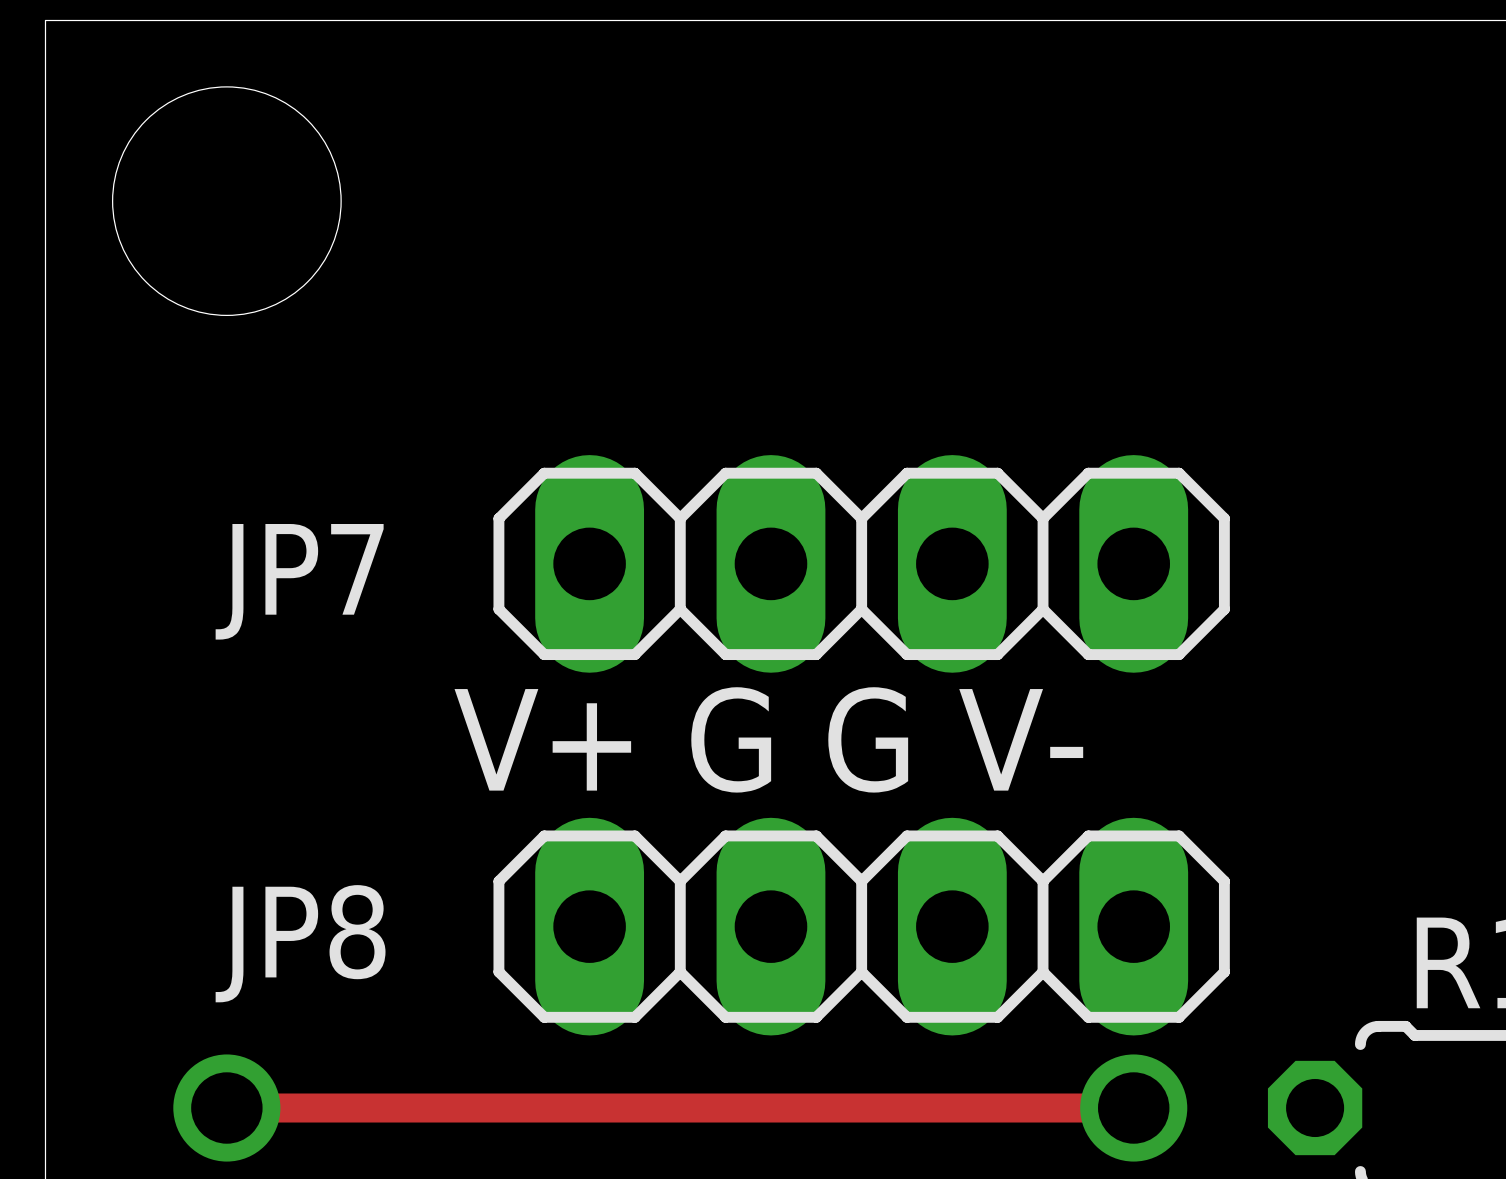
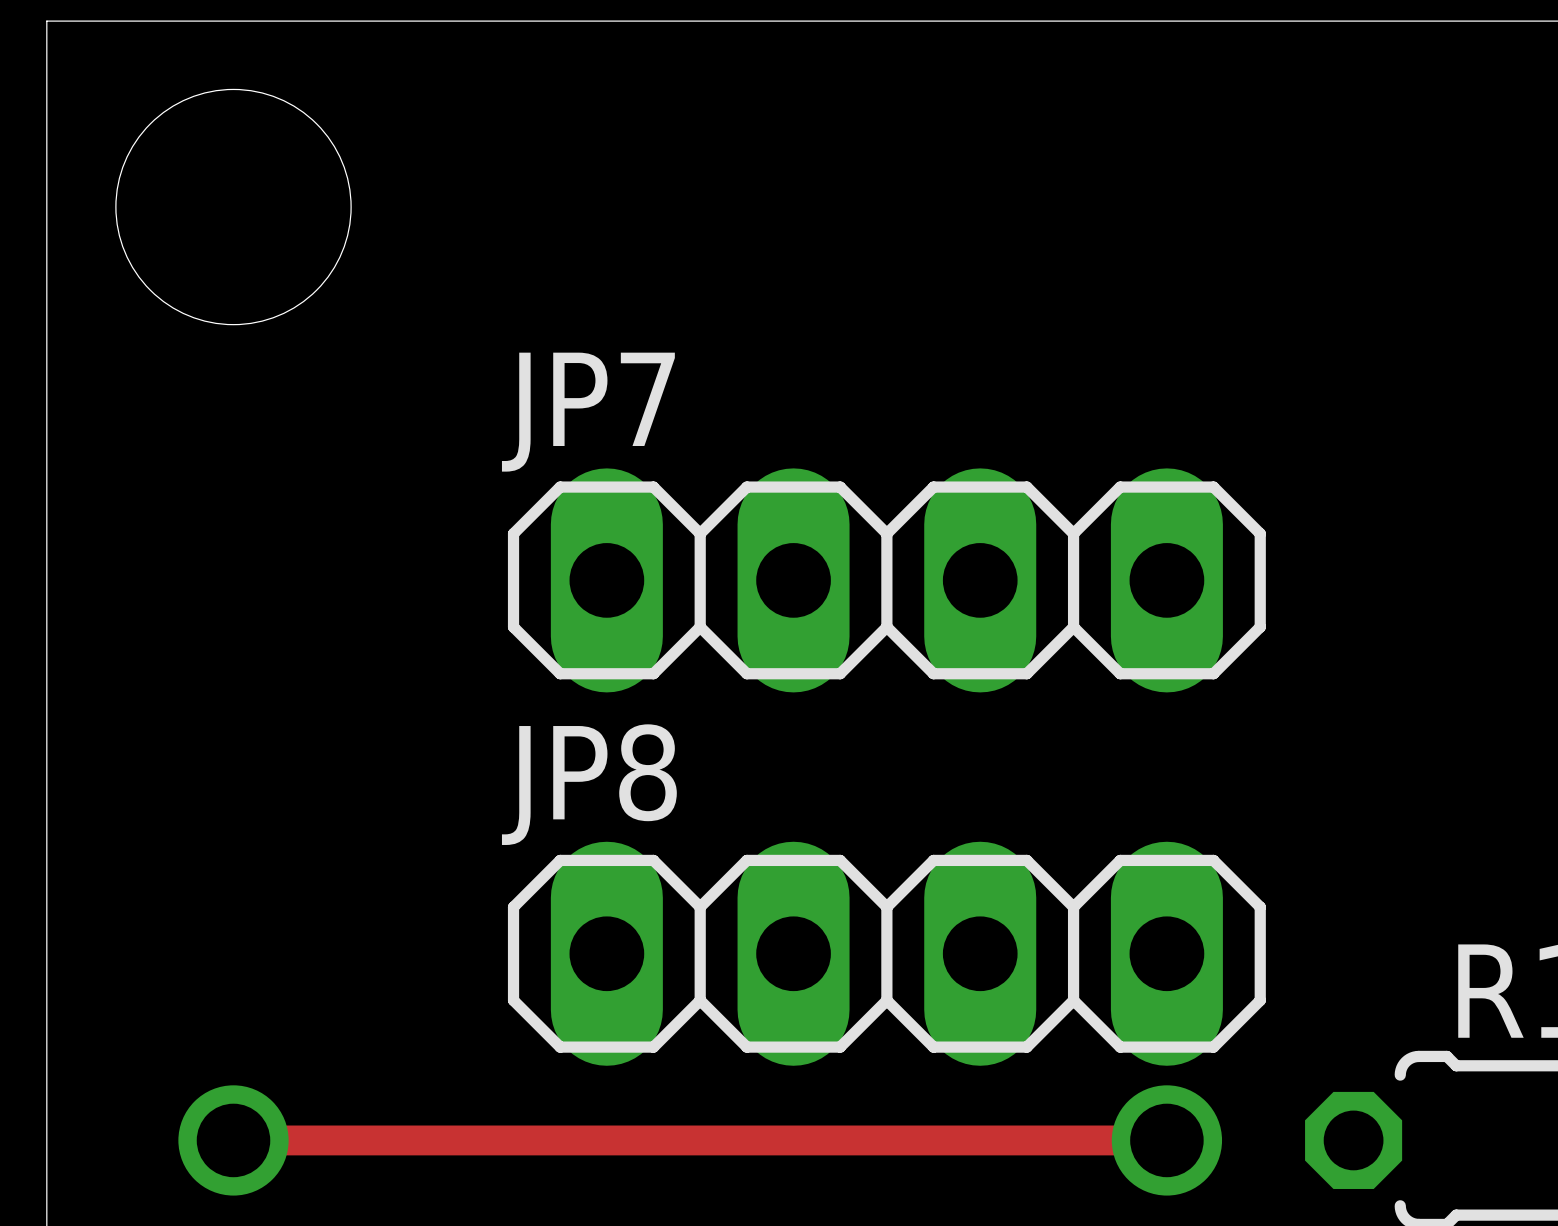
JP7 name position: JP7 (299, 581) -> JP7 (588, 412)
text: V+ G G V- (768, 739) -> none
JP8 name position: JP8 (300, 943) -> JP8 (589, 784)

